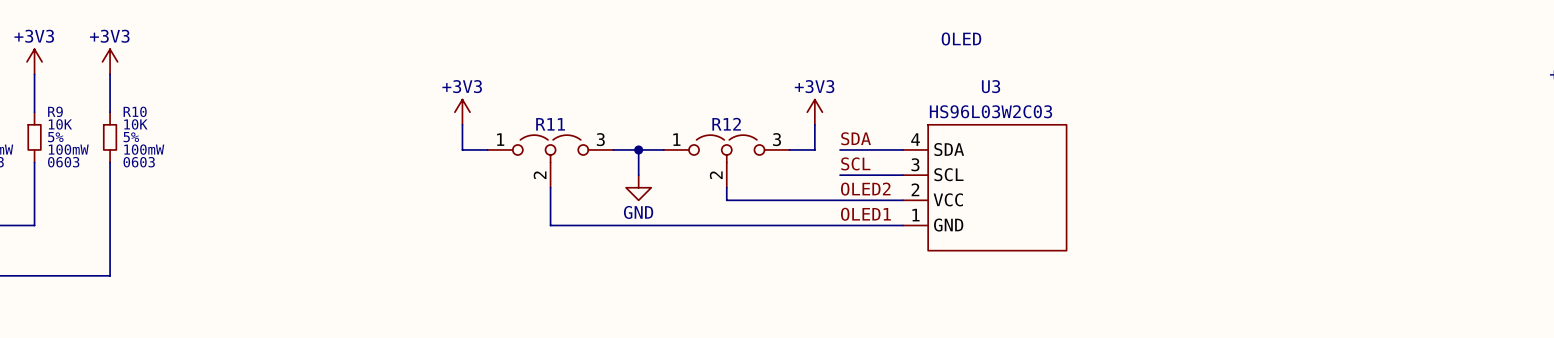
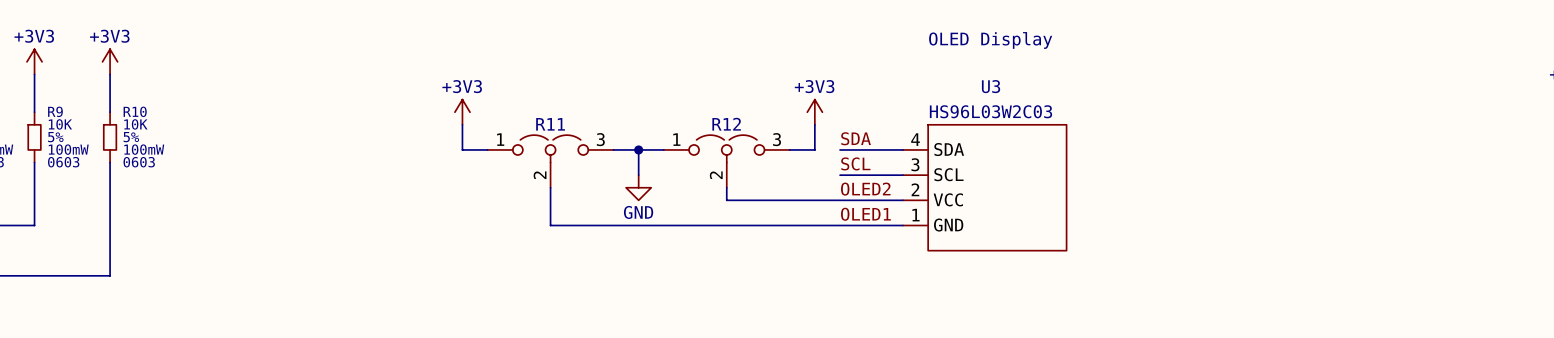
text: OLED (961, 38) -> none
text: none -> OLED Display (990, 40)

